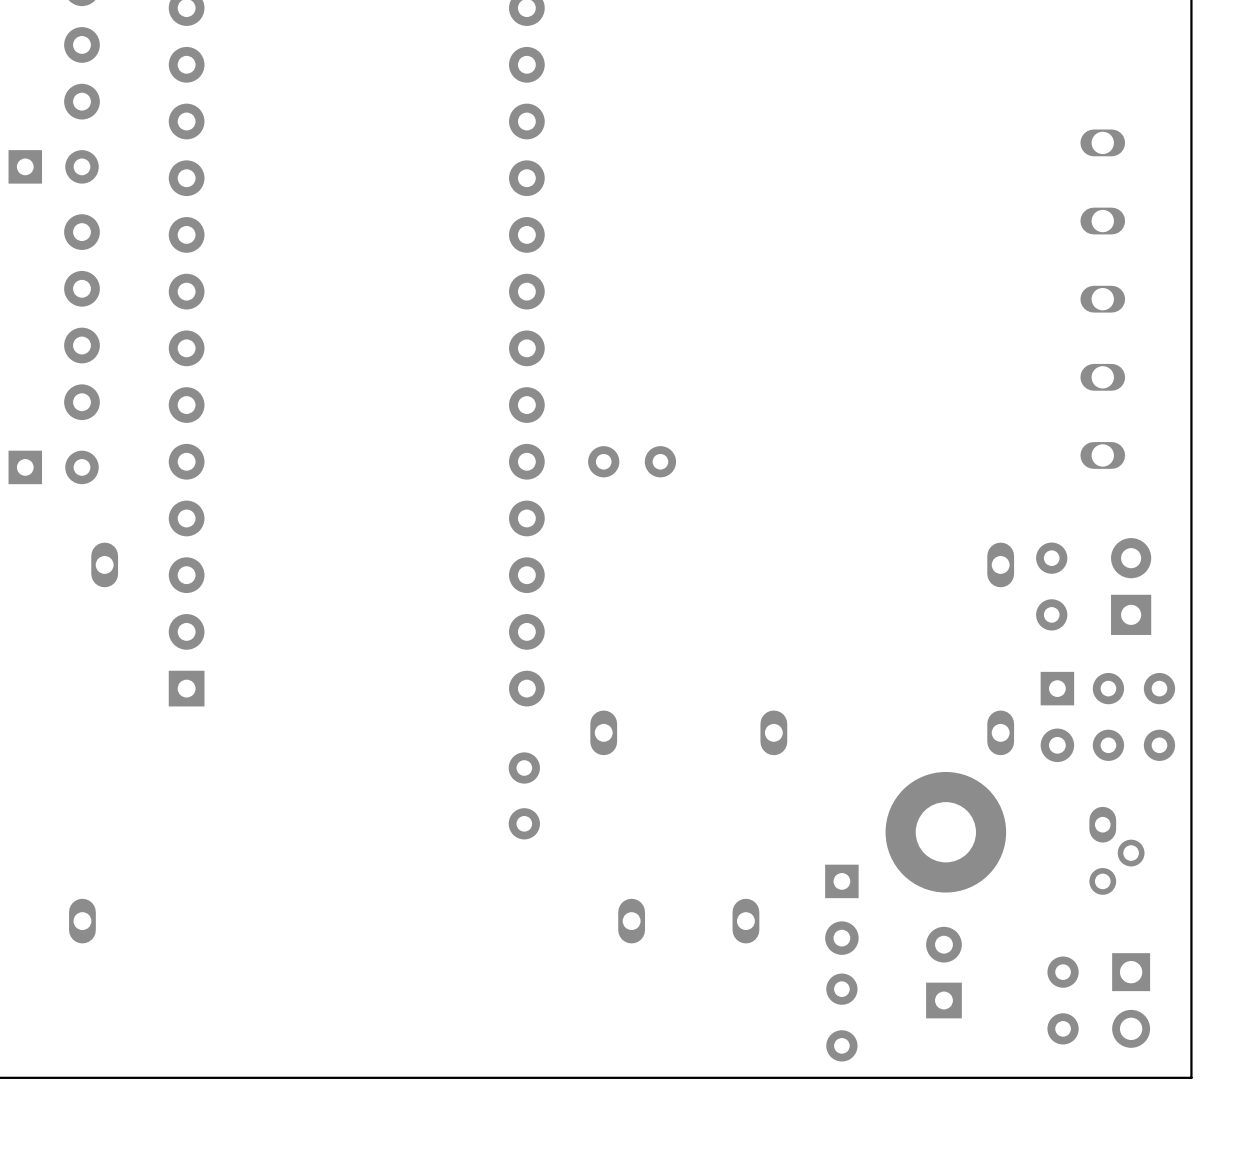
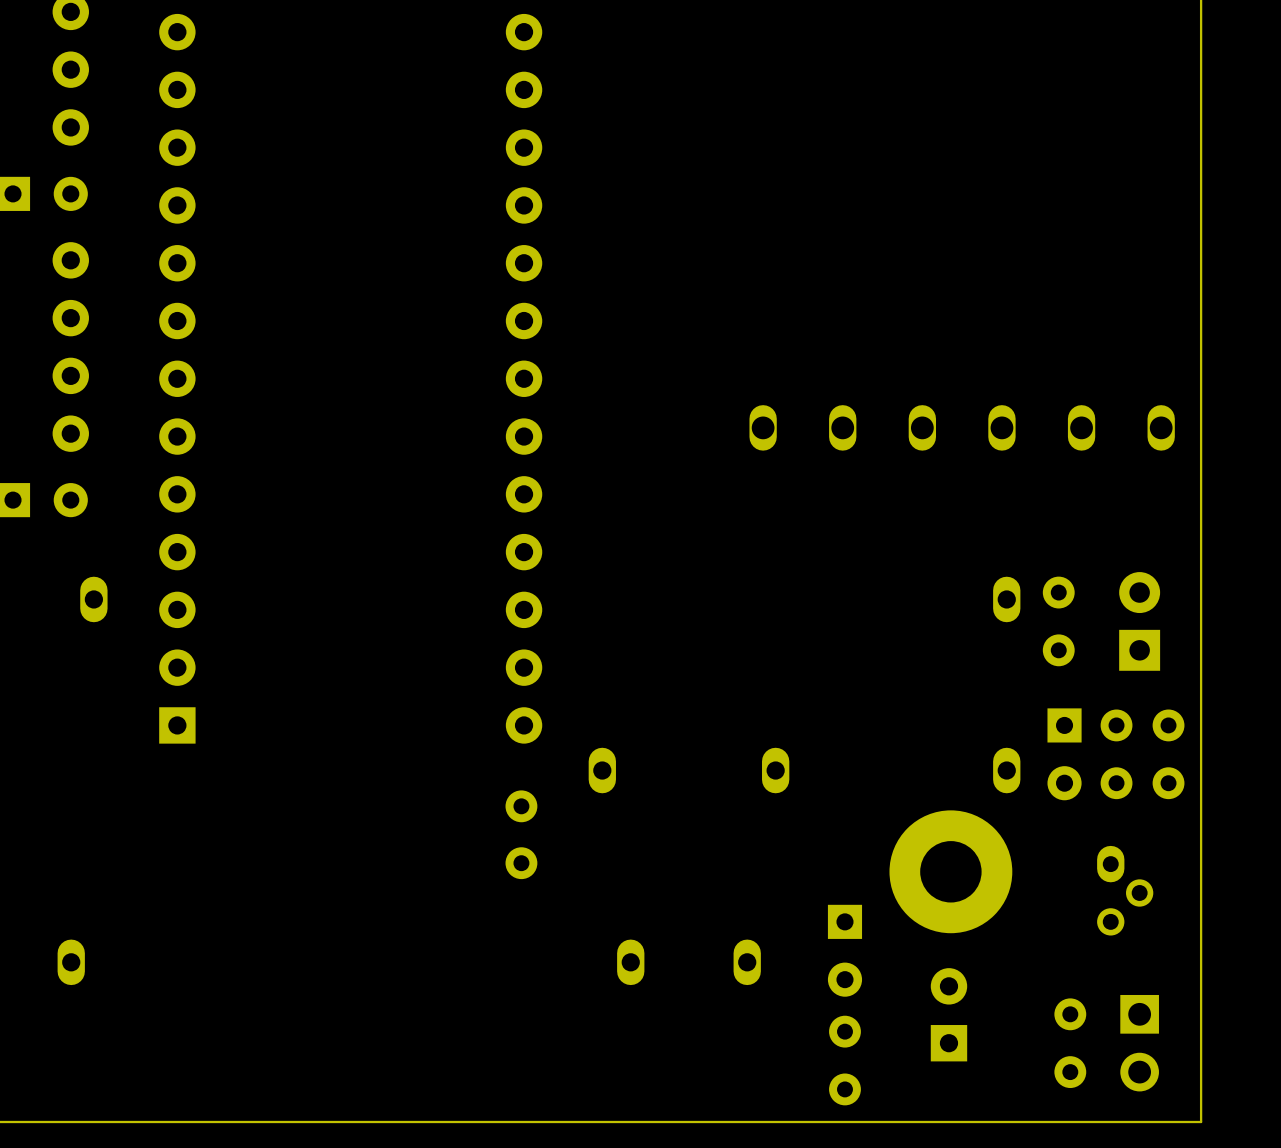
part: (1102, 299) -> none
part: none -> (962, 427)
part: (632, 461) -> none

